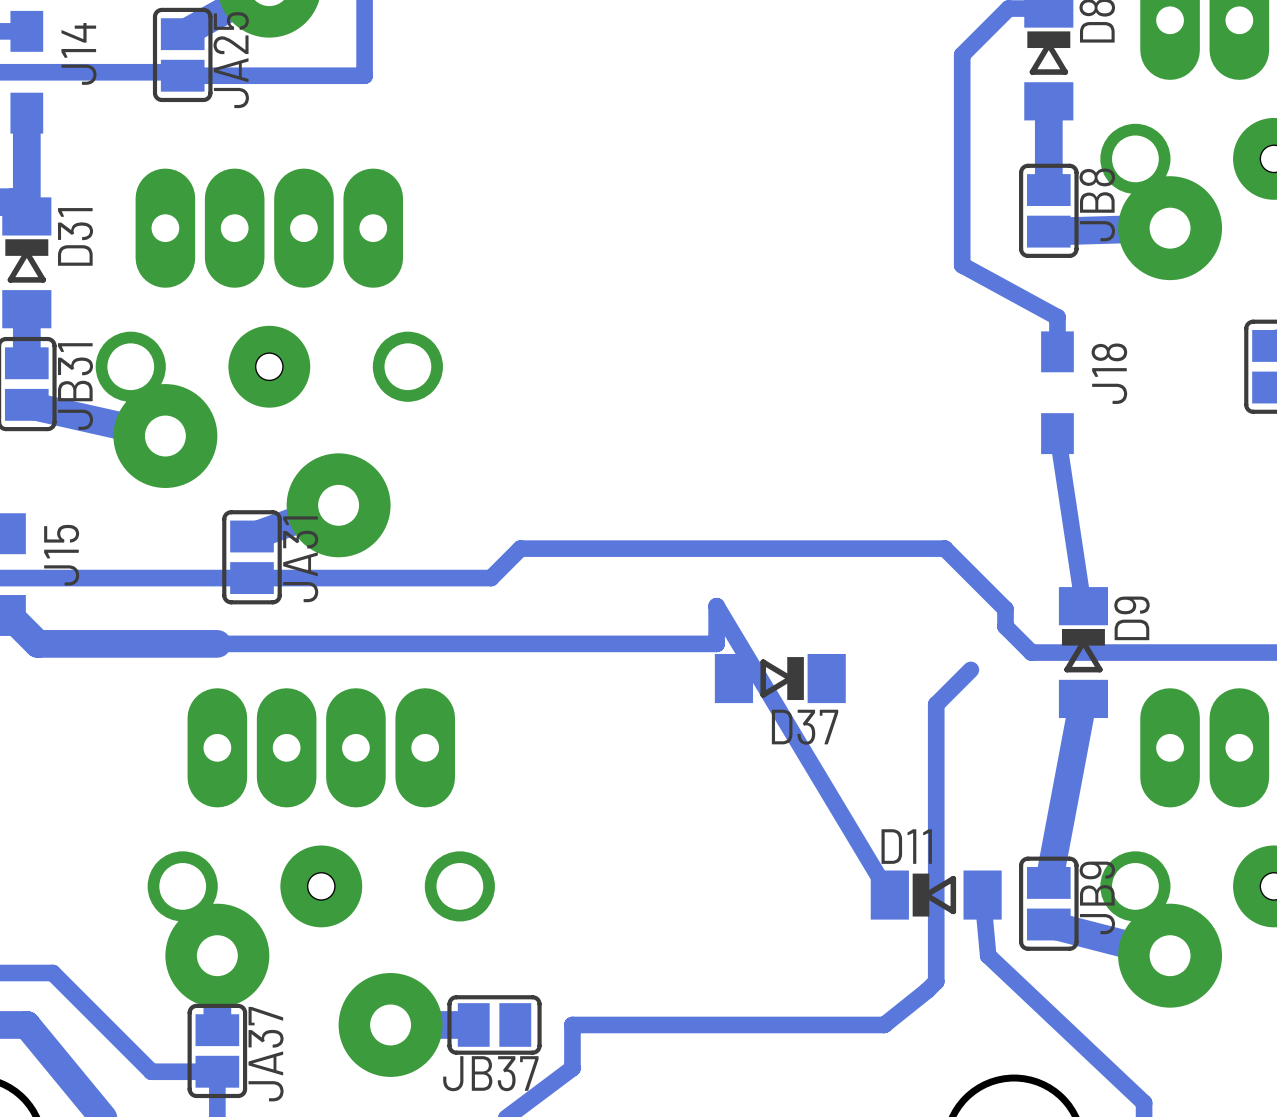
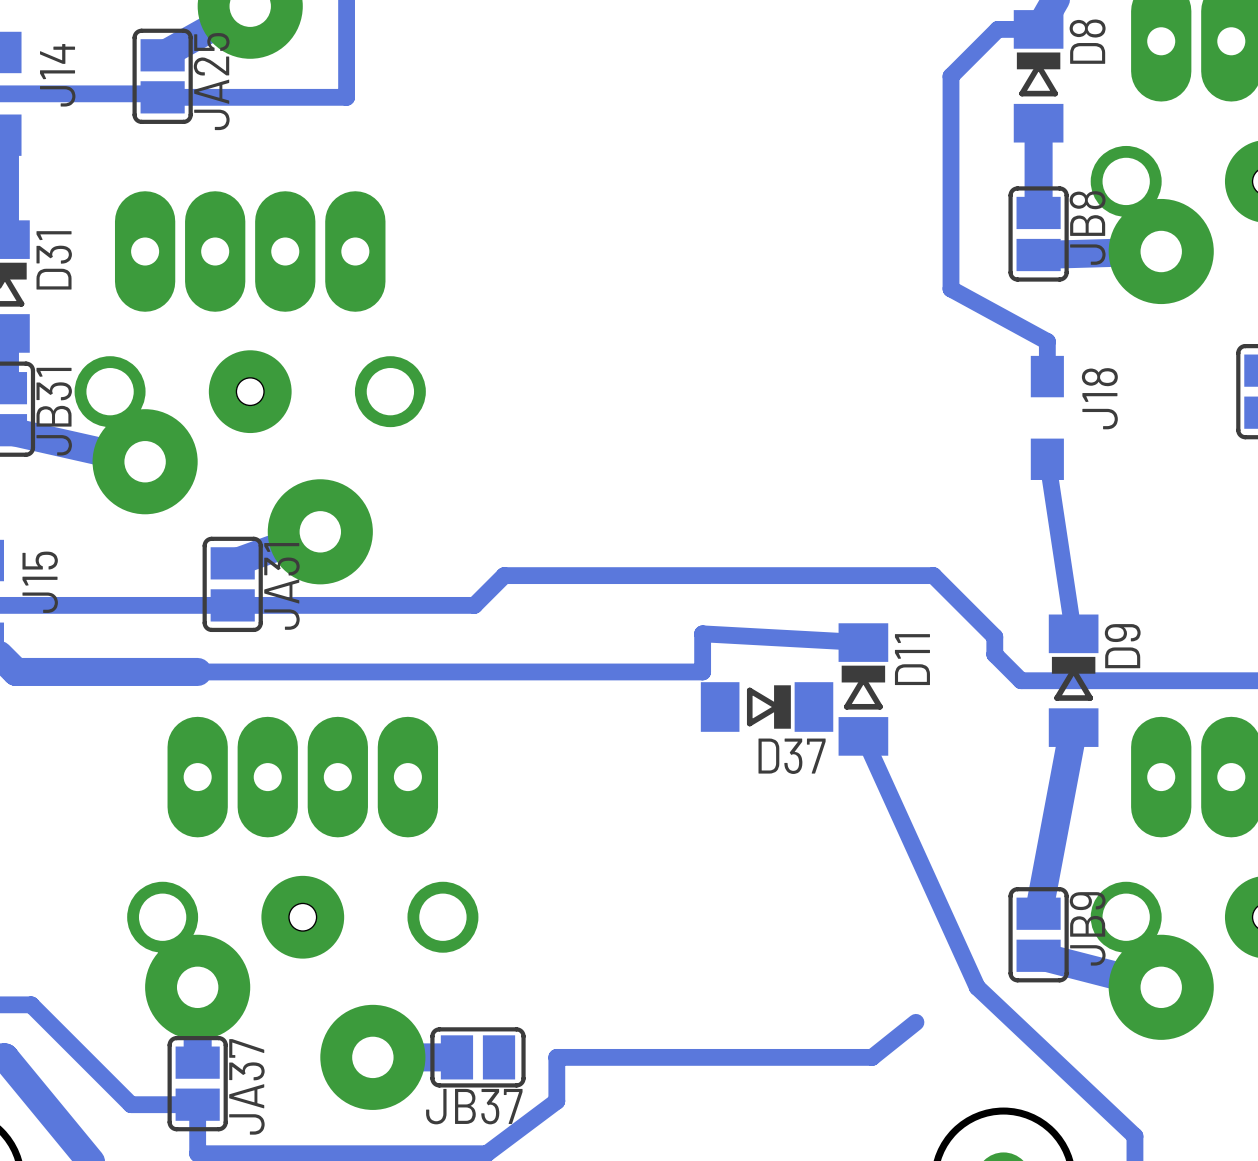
track: (716, 606) (889, 895) -> (702, 633) (863, 642)
track: (970, 669) (936, 704) (936, 981) (927, 990) -> none
D11 rotation: 0° (936, 895) -> 90° clockwise (863, 689)
D11 position: (936, 895) -> (863, 689)
track: (982, 895) (988, 955) -> (863, 736) (977, 987)

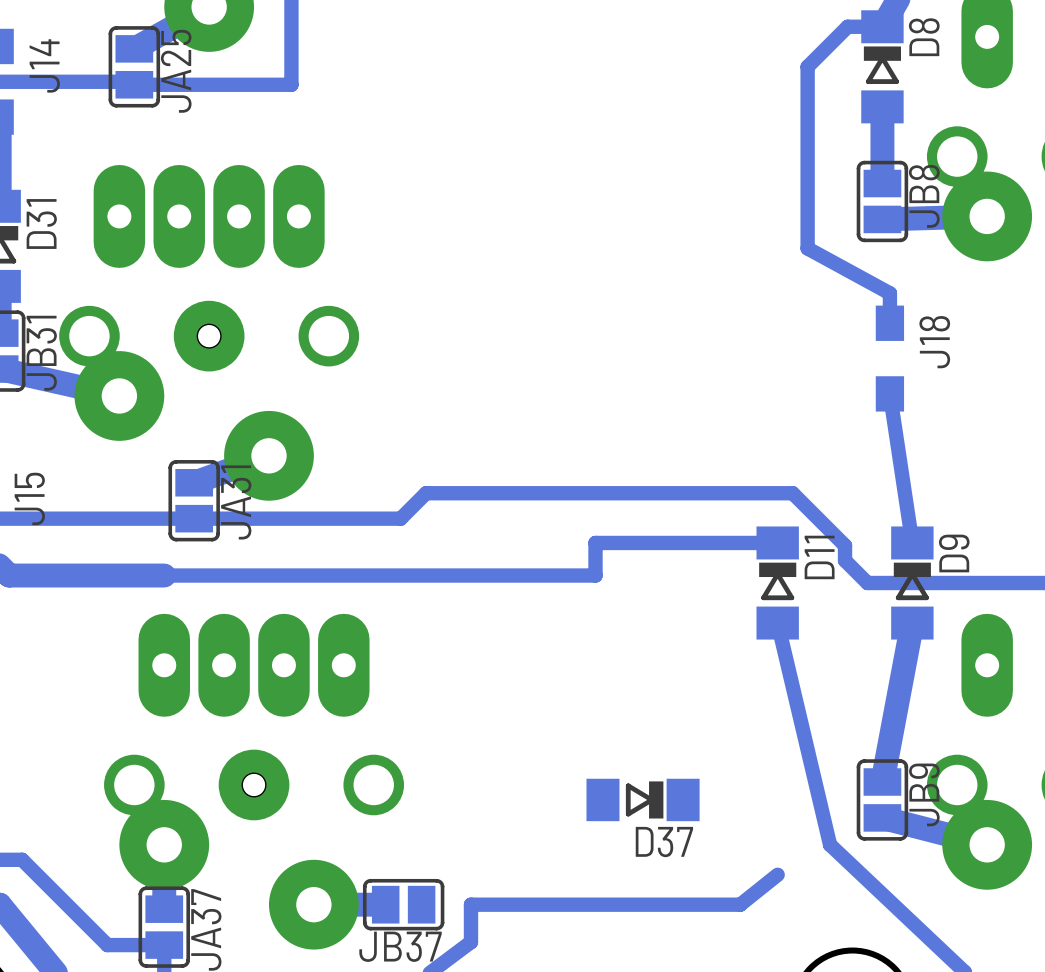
track: (702, 633) (863, 642) -> (595, 542) (777, 542)
D11 position: (863, 689) -> (777, 583)
D37 position: (767, 707) -> (643, 799)
track: (863, 736) (977, 987) -> (777, 623) (830, 844)

